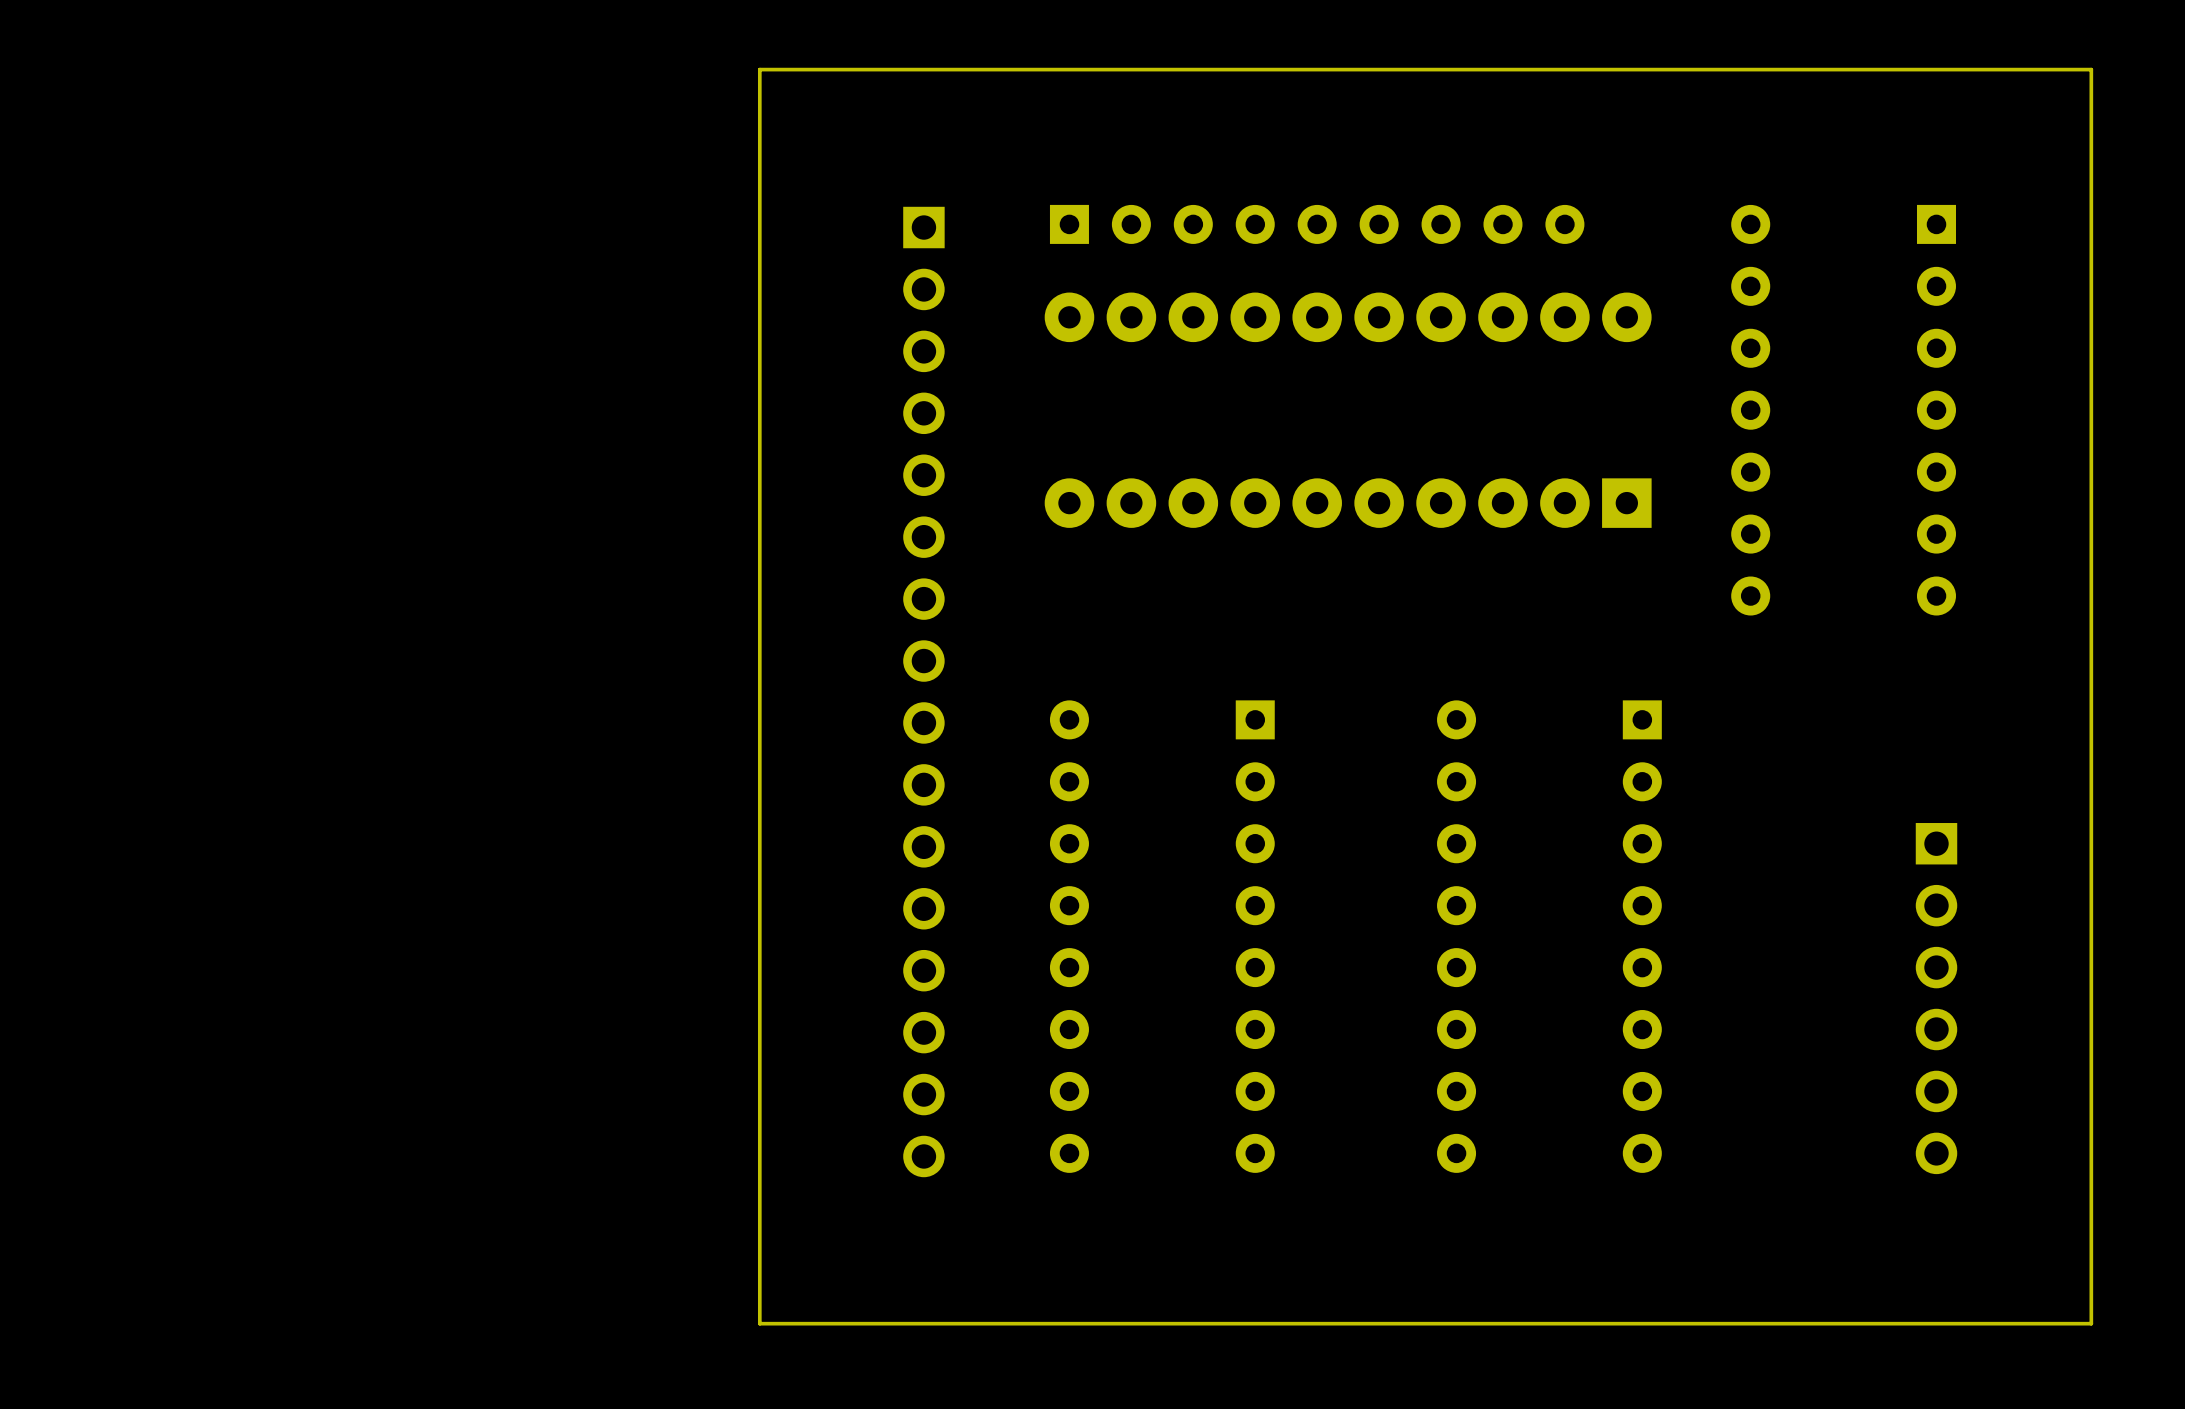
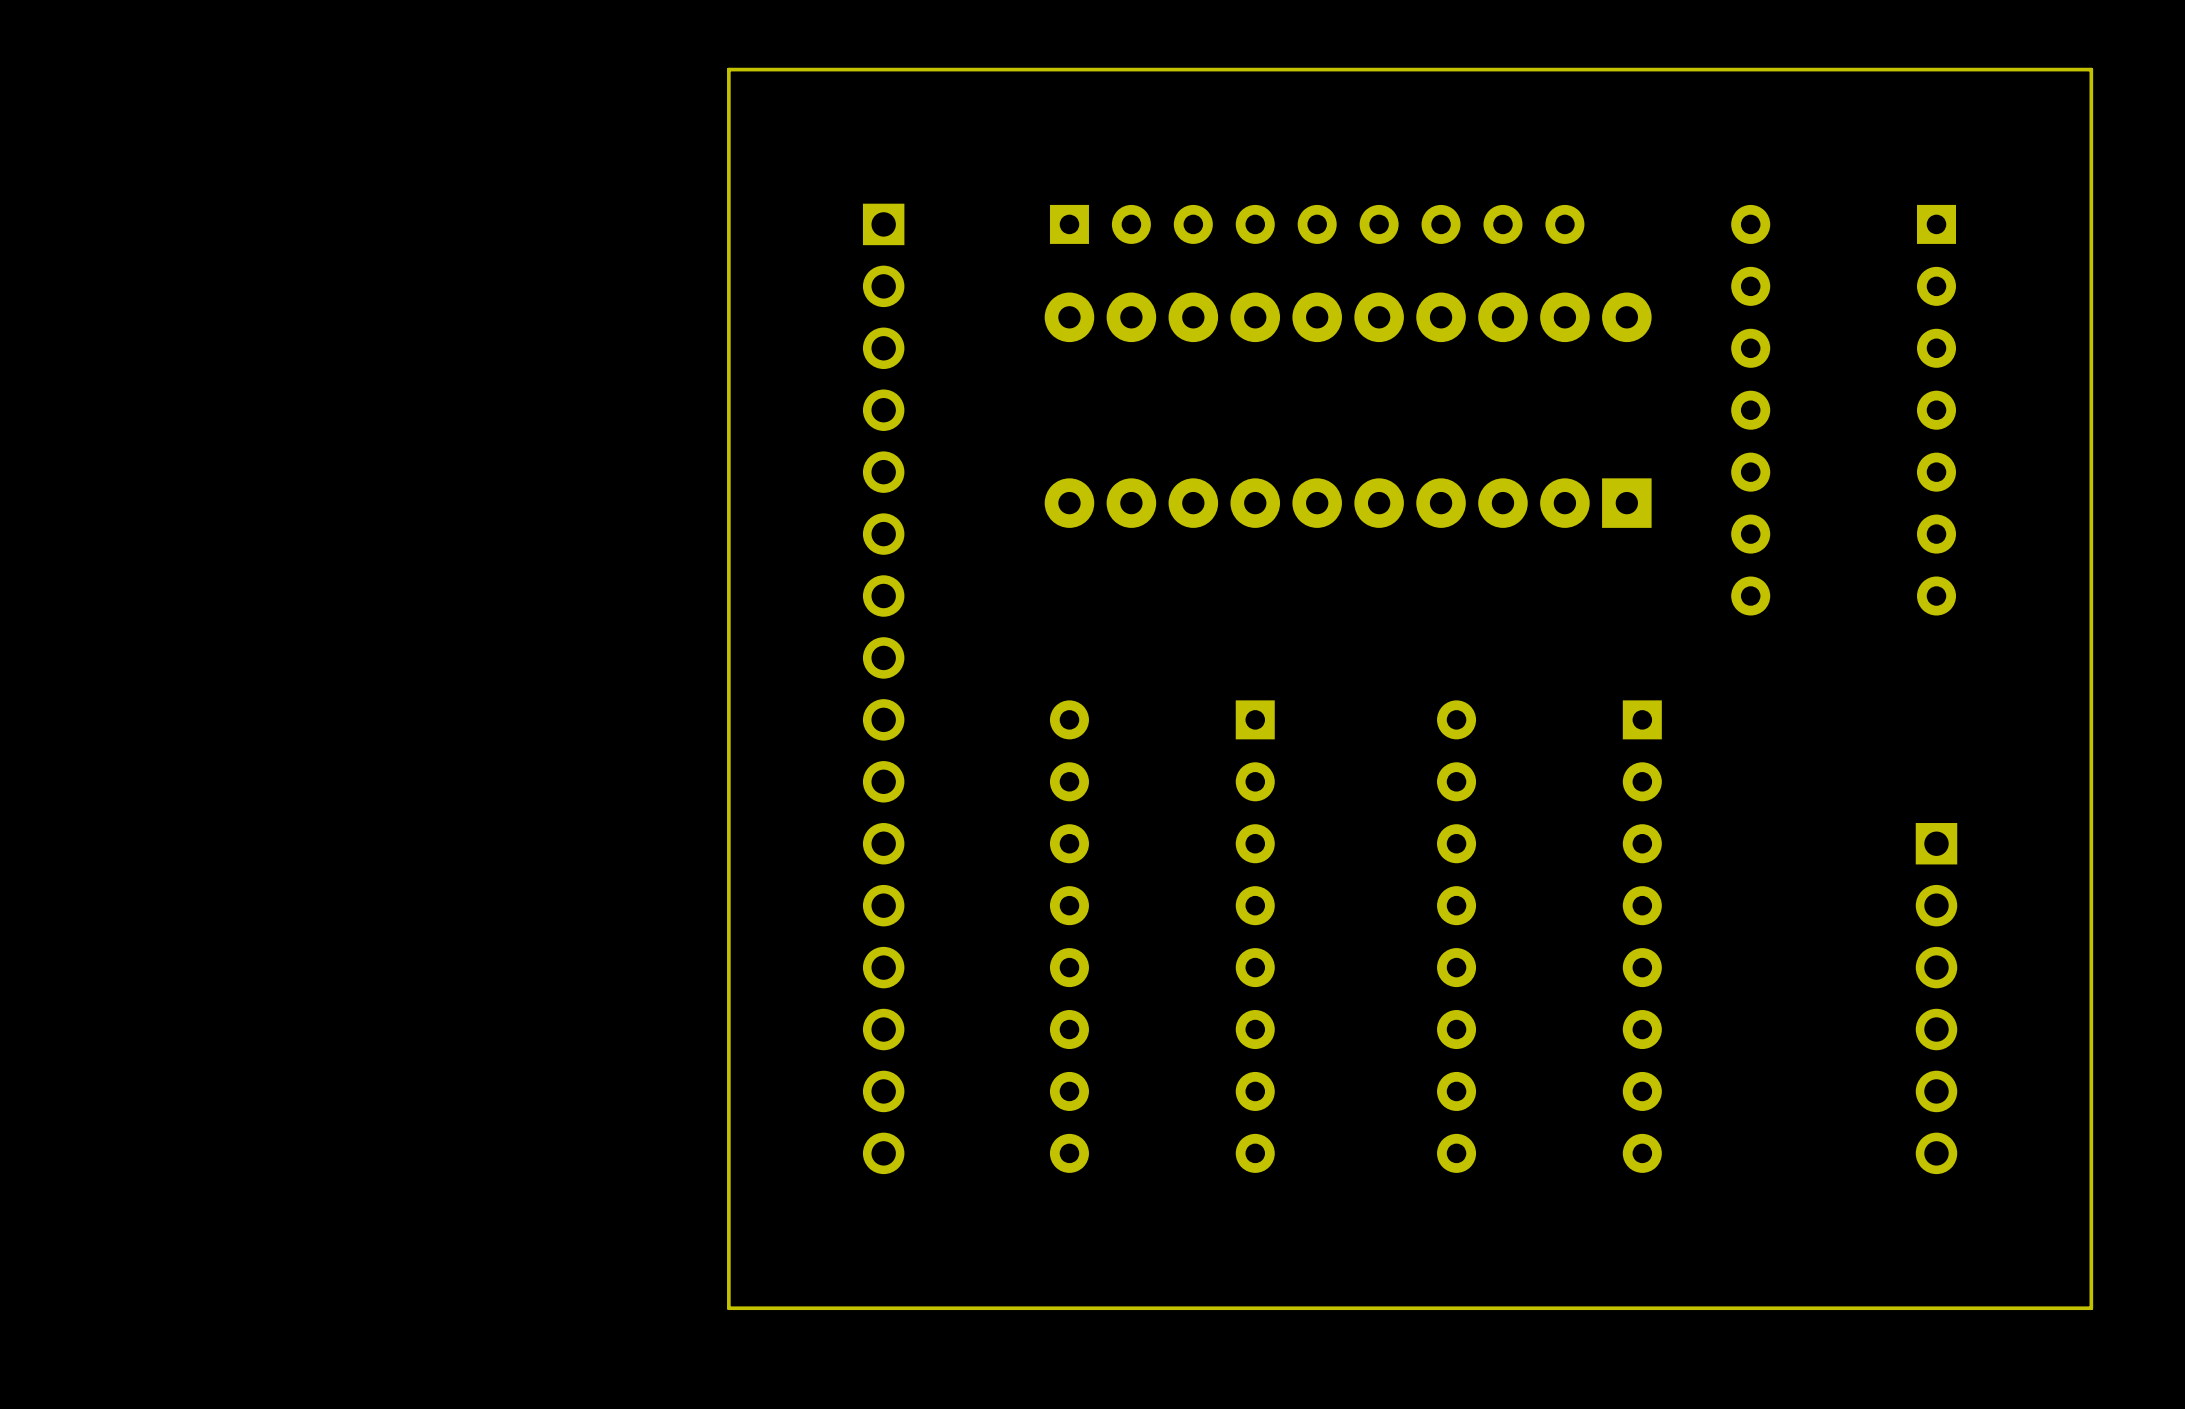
board edge: (759, 69) (759, 1323) (2091, 1323) (2091, 1308) -> (759, 69) (728, 69) (728, 1308) (2091, 1308)
part position: (923, 692) -> (883, 688)

